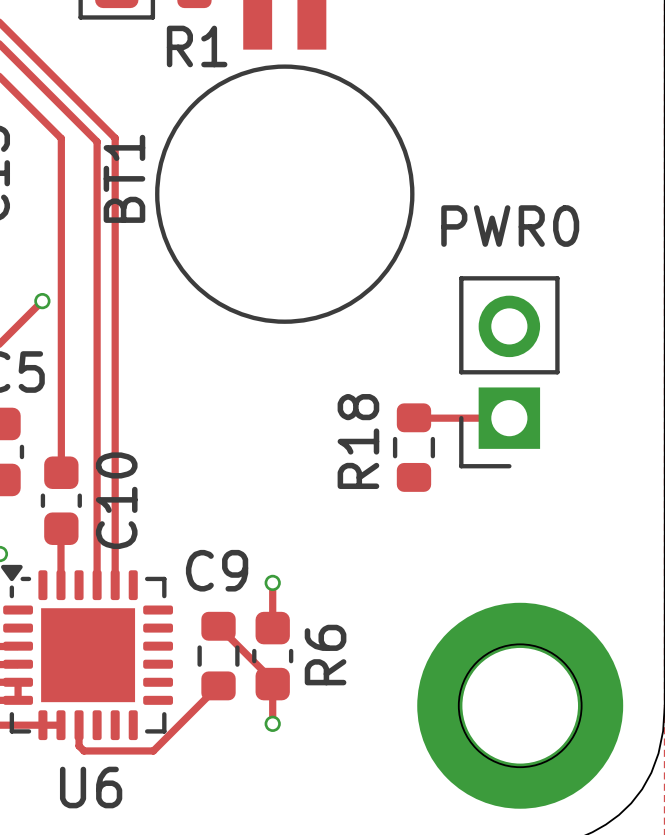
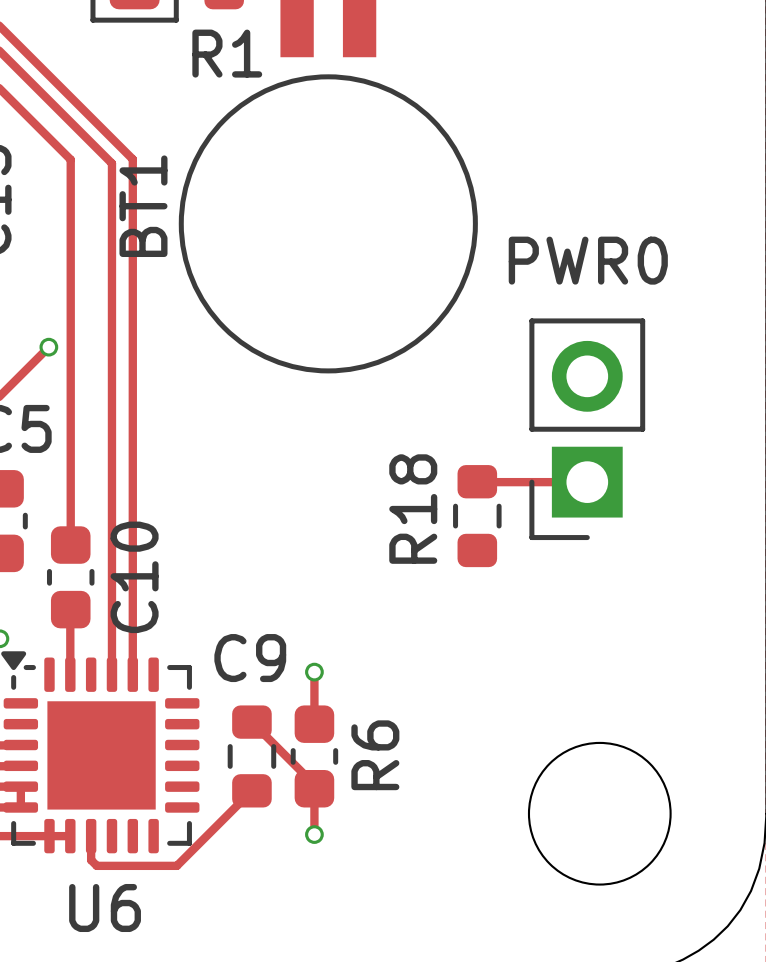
part: (520, 705) -> none

